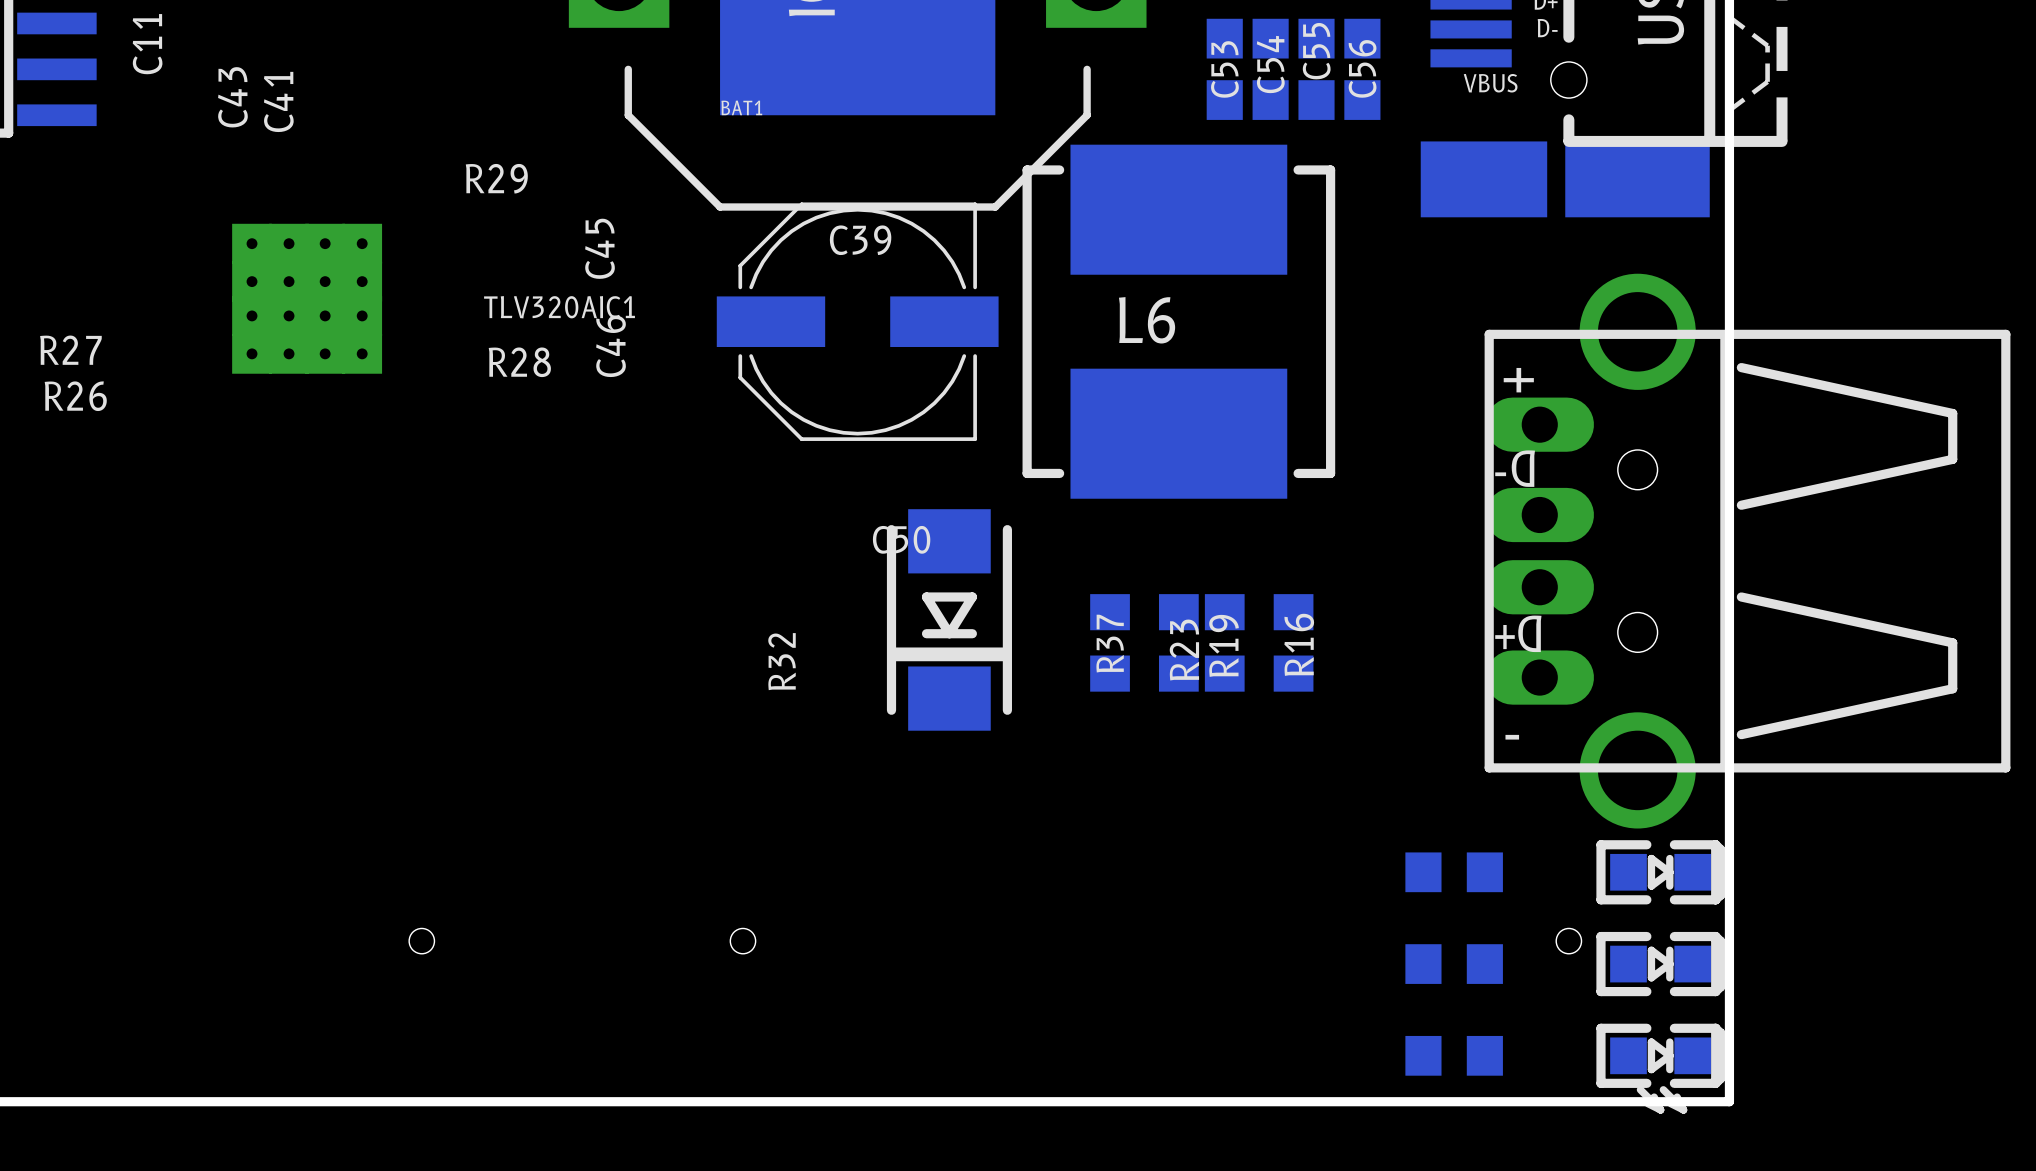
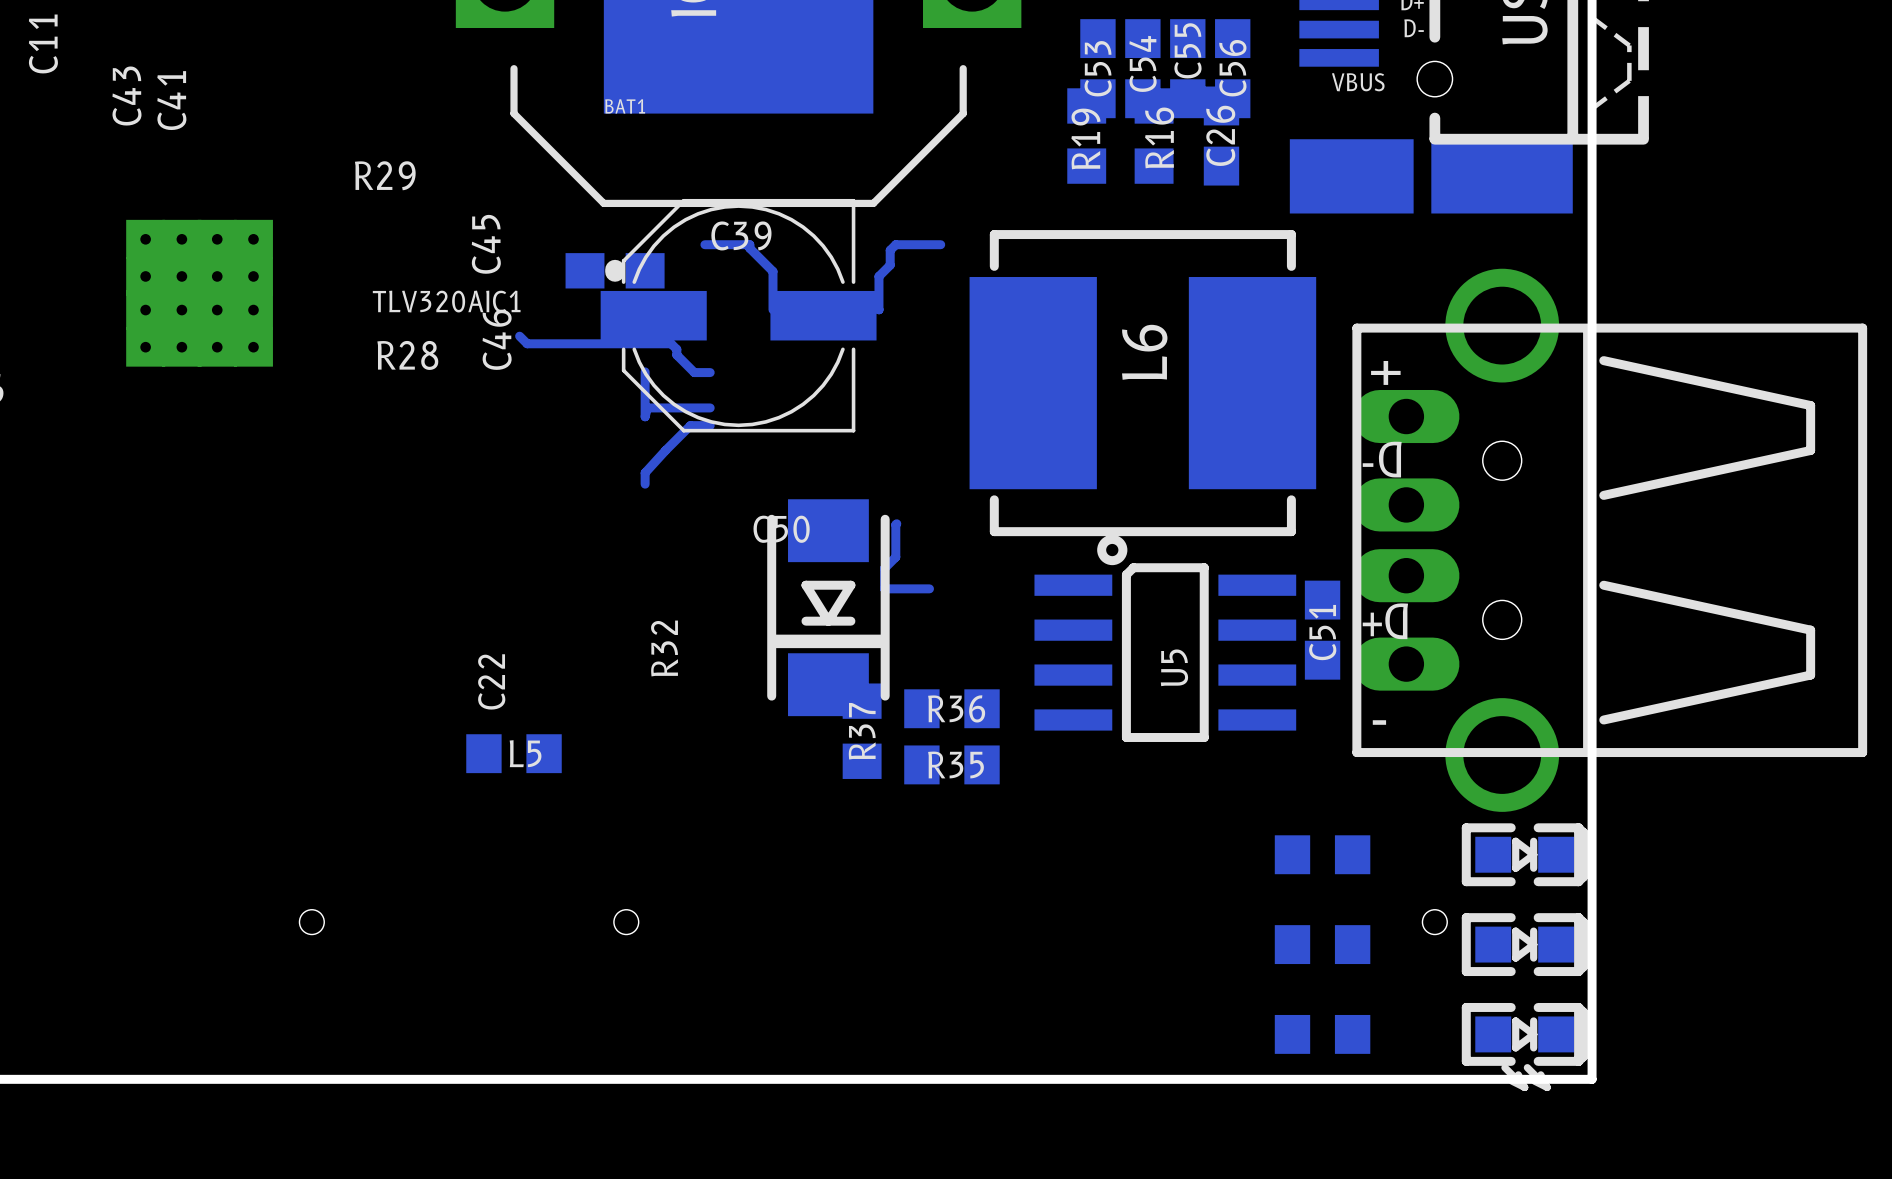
C26: none -> (1221, 136)
track: none -> (704, 244) (749, 244) (749, 248) (772, 271) (772, 309)
track: none -> (940, 244) (895, 244) (890, 250) (890, 265) (878, 276) (878, 309)
part: none -> (615, 270)
L6 rotation: 0° (1178, 321) -> 90° clockwise (1142, 383)
track: none -> (519, 336) (527, 343) (671, 343) (676, 349) (676, 355) (694, 372) (710, 372)
track: none -> (645, 371) (645, 416) (647, 407) (710, 407)
track: none -> (710, 425) (690, 425) (645, 472) (645, 484)
track: none -> (896, 523) (895, 557) (884, 568) (884, 588) (929, 588)
R37 position: (1110, 642) -> (862, 731)
R23: (1178, 642) -> none
R19 position: (1224, 642) -> (1086, 136)
R16 position: (1293, 642) -> (1154, 136)
C51: none -> (1322, 630)
R37 name position: R37 (1110, 643) -> R37 (862, 731)
U5: none -> (1165, 638)
C22: none -> (491, 681)
R36: none -> (951, 708)
L5: none -> (514, 753)
R35: none -> (951, 764)

